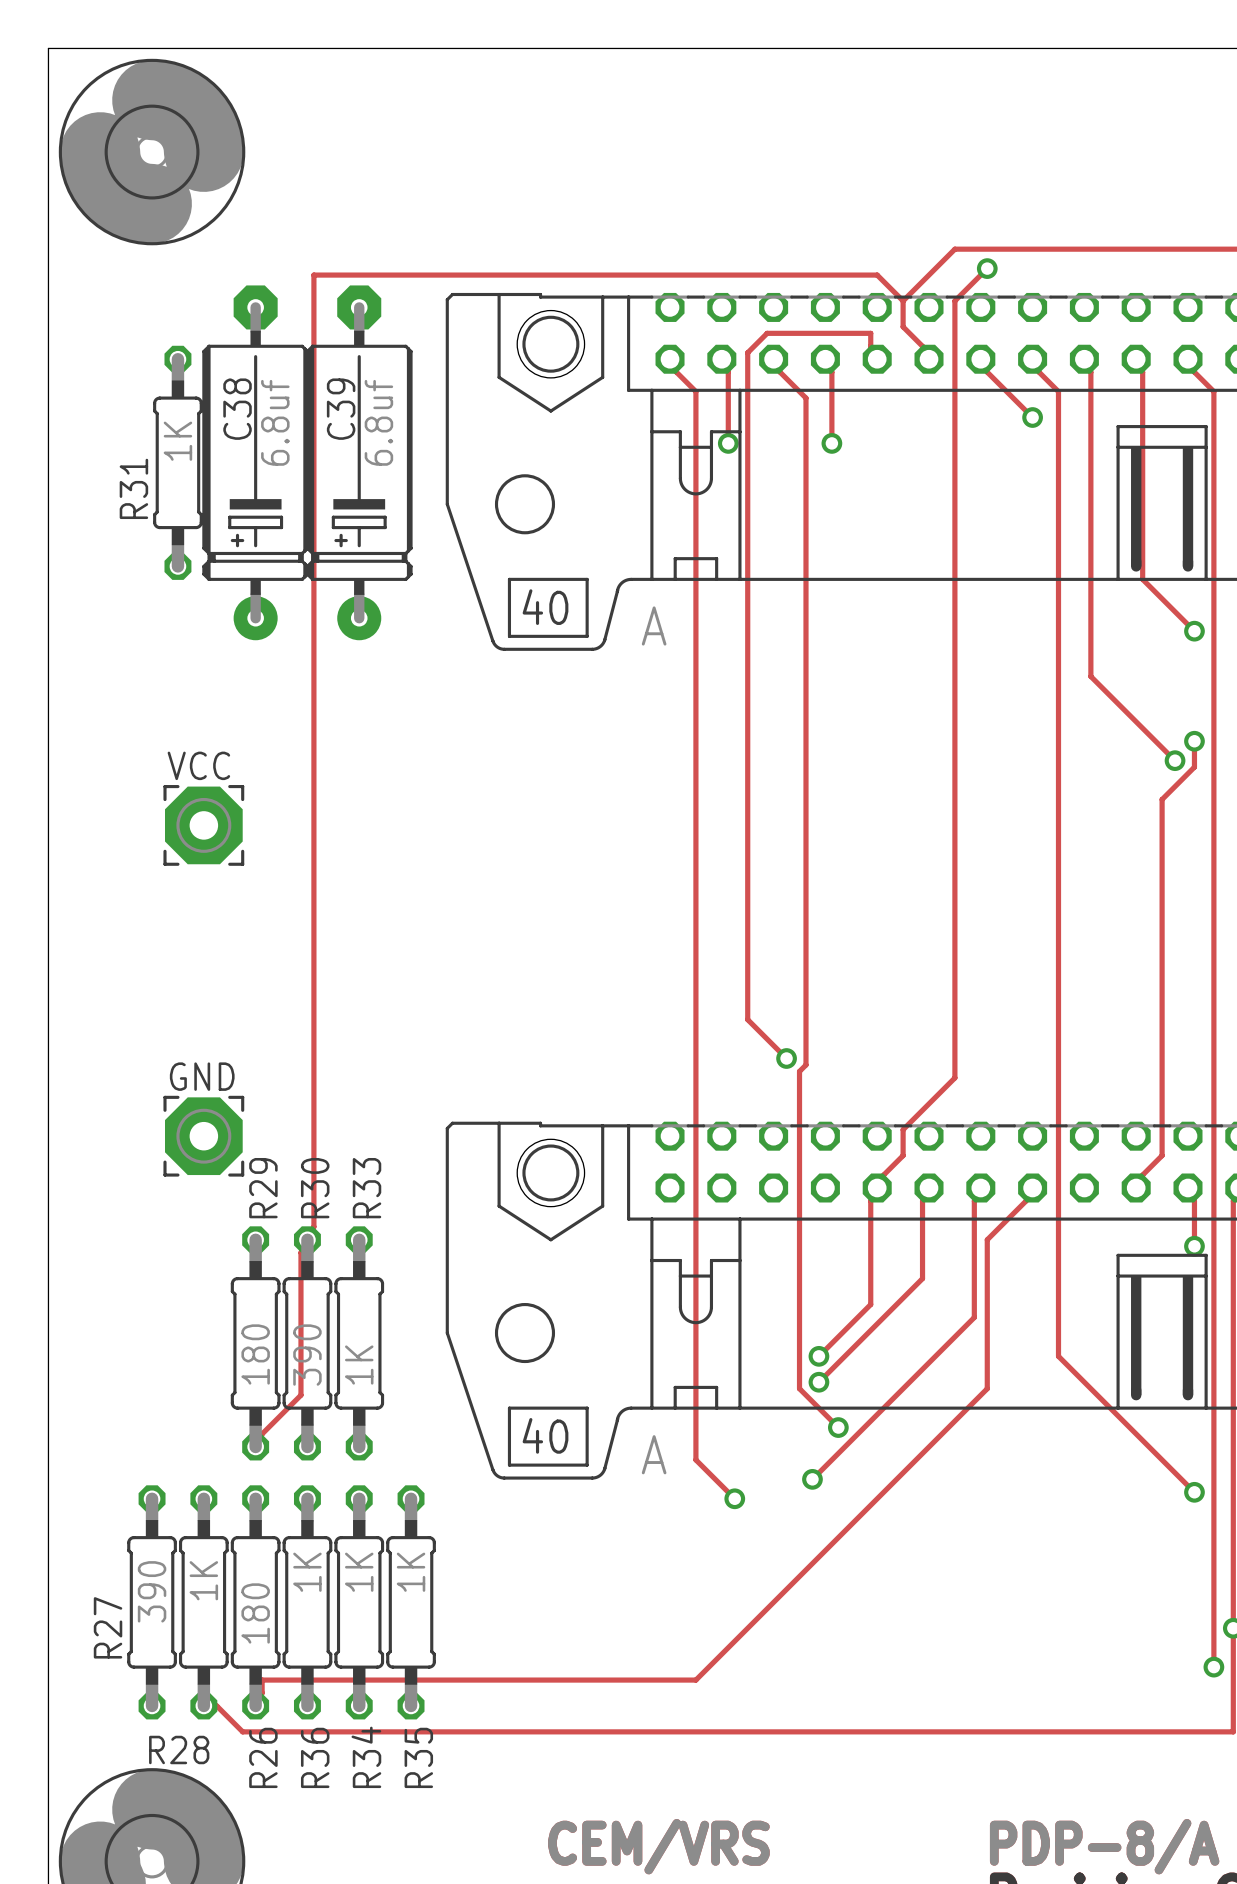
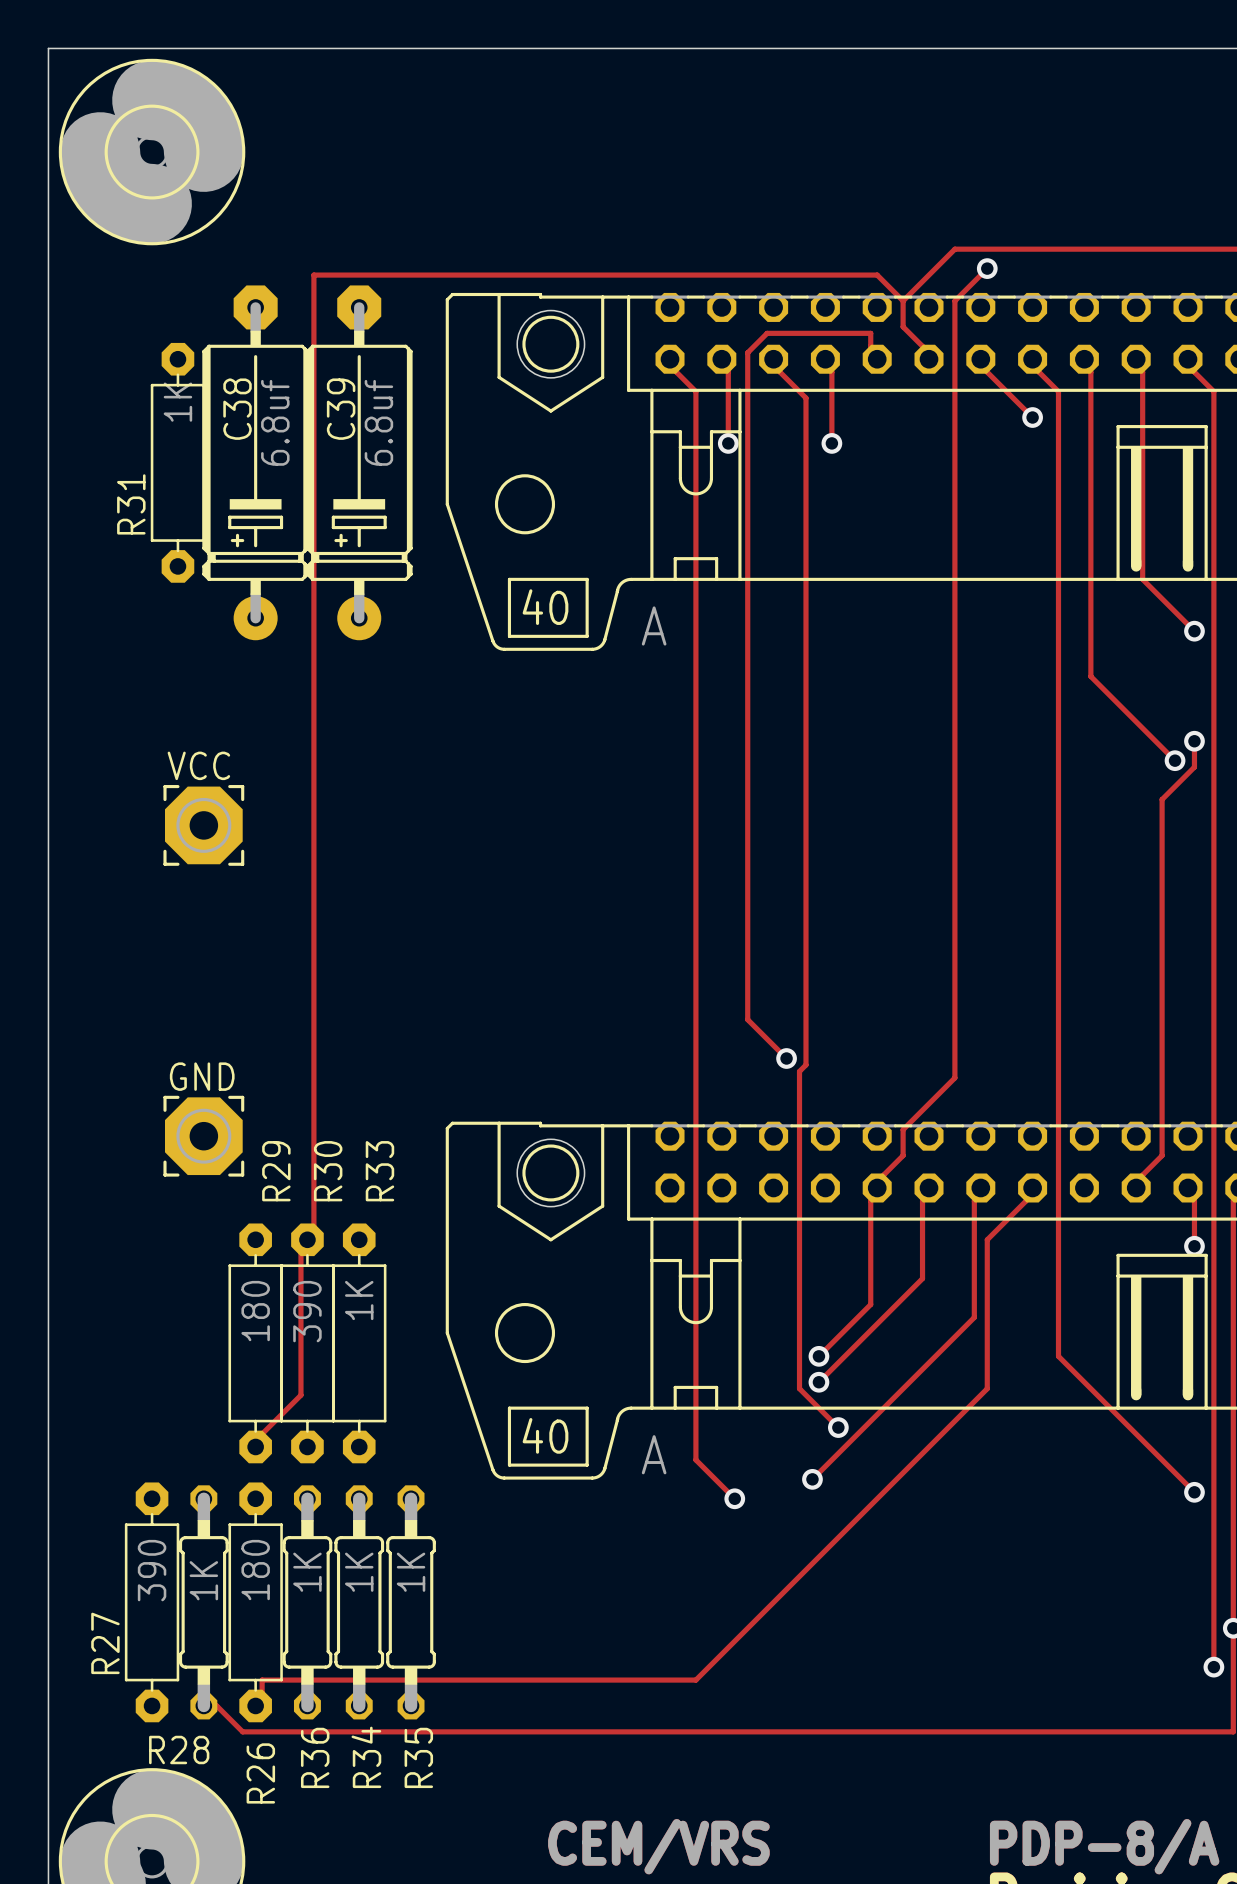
R31 footprint: [153, 345, 203, 580] -> [150, 342, 206, 583]
R31 value position: 1K (177, 441) -> 1K (177, 402)
R29 footprint: [230, 1226, 281, 1461] -> [228, 1223, 283, 1464]
R30 footprint: [282, 1226, 333, 1461] -> [280, 1223, 335, 1464]
R33 footprint: [334, 1226, 385, 1461] -> [332, 1223, 387, 1464]
R33 value position: 1K (359, 1365) -> 1K (359, 1300)
R27 footprint: [127, 1485, 177, 1720] -> [124, 1482, 180, 1723]
R26 footprint: [230, 1485, 281, 1720] -> [228, 1482, 283, 1723]

